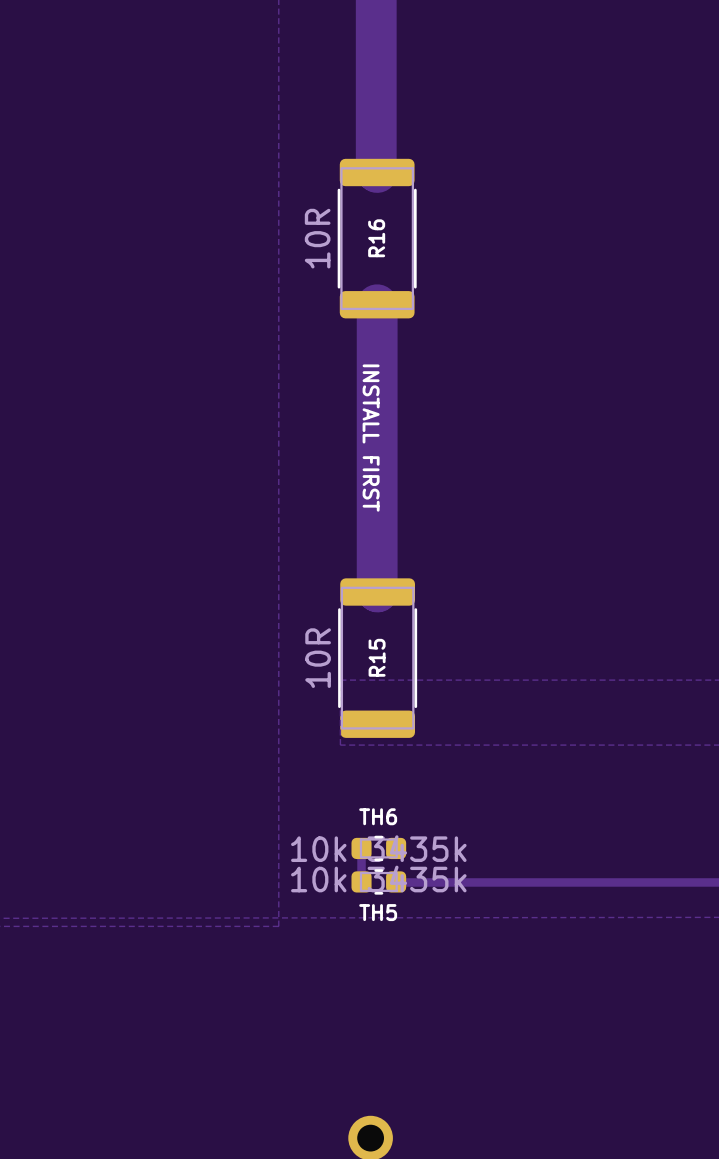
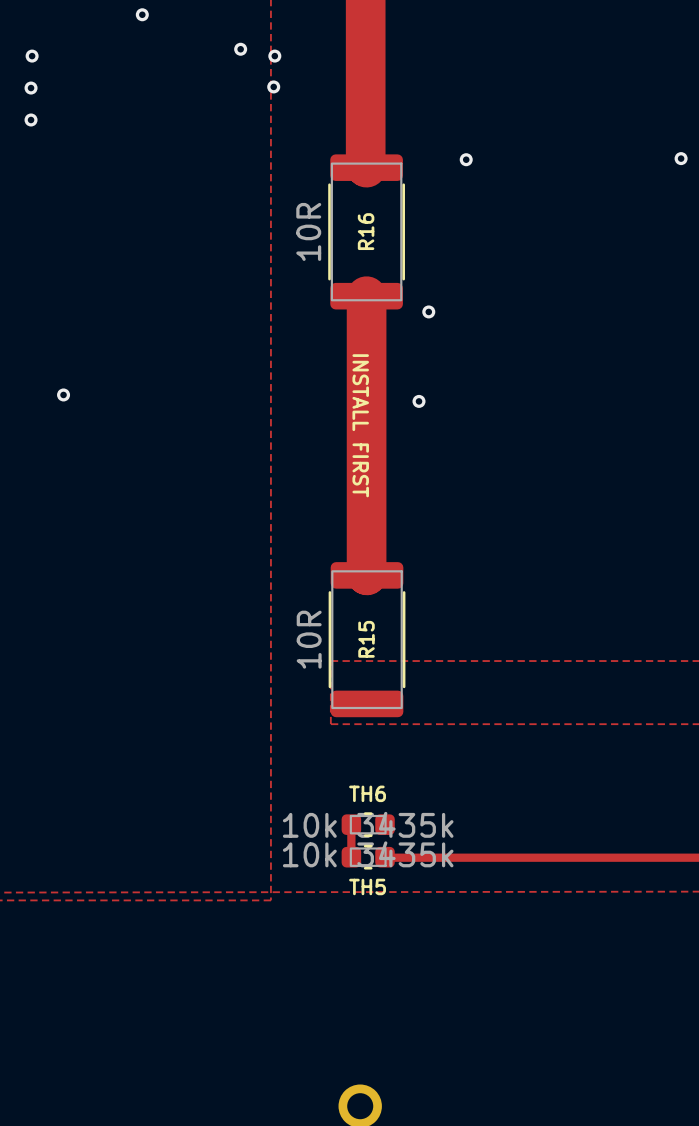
via: none -> (142, 14)
via: none -> (240, 49)
via: none -> (32, 56)
via: none -> (274, 56)
via: none -> (273, 86)
via: none -> (31, 88)
via: none -> (31, 119)
via: none -> (681, 158)
via: none -> (466, 159)
via: none -> (428, 311)
via: none -> (63, 394)
via: none -> (419, 401)

